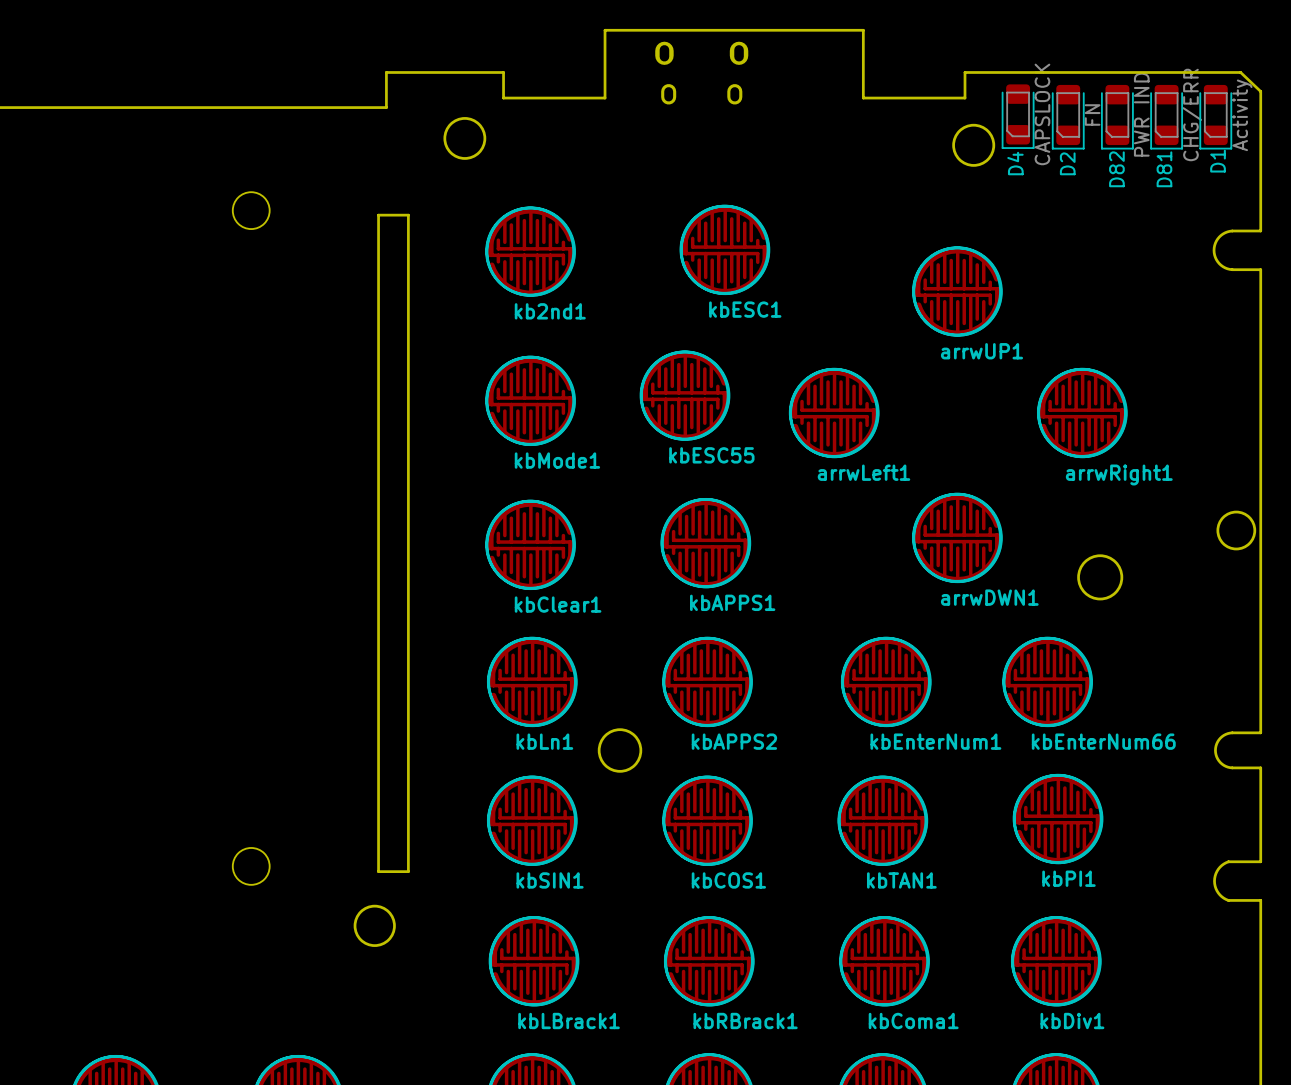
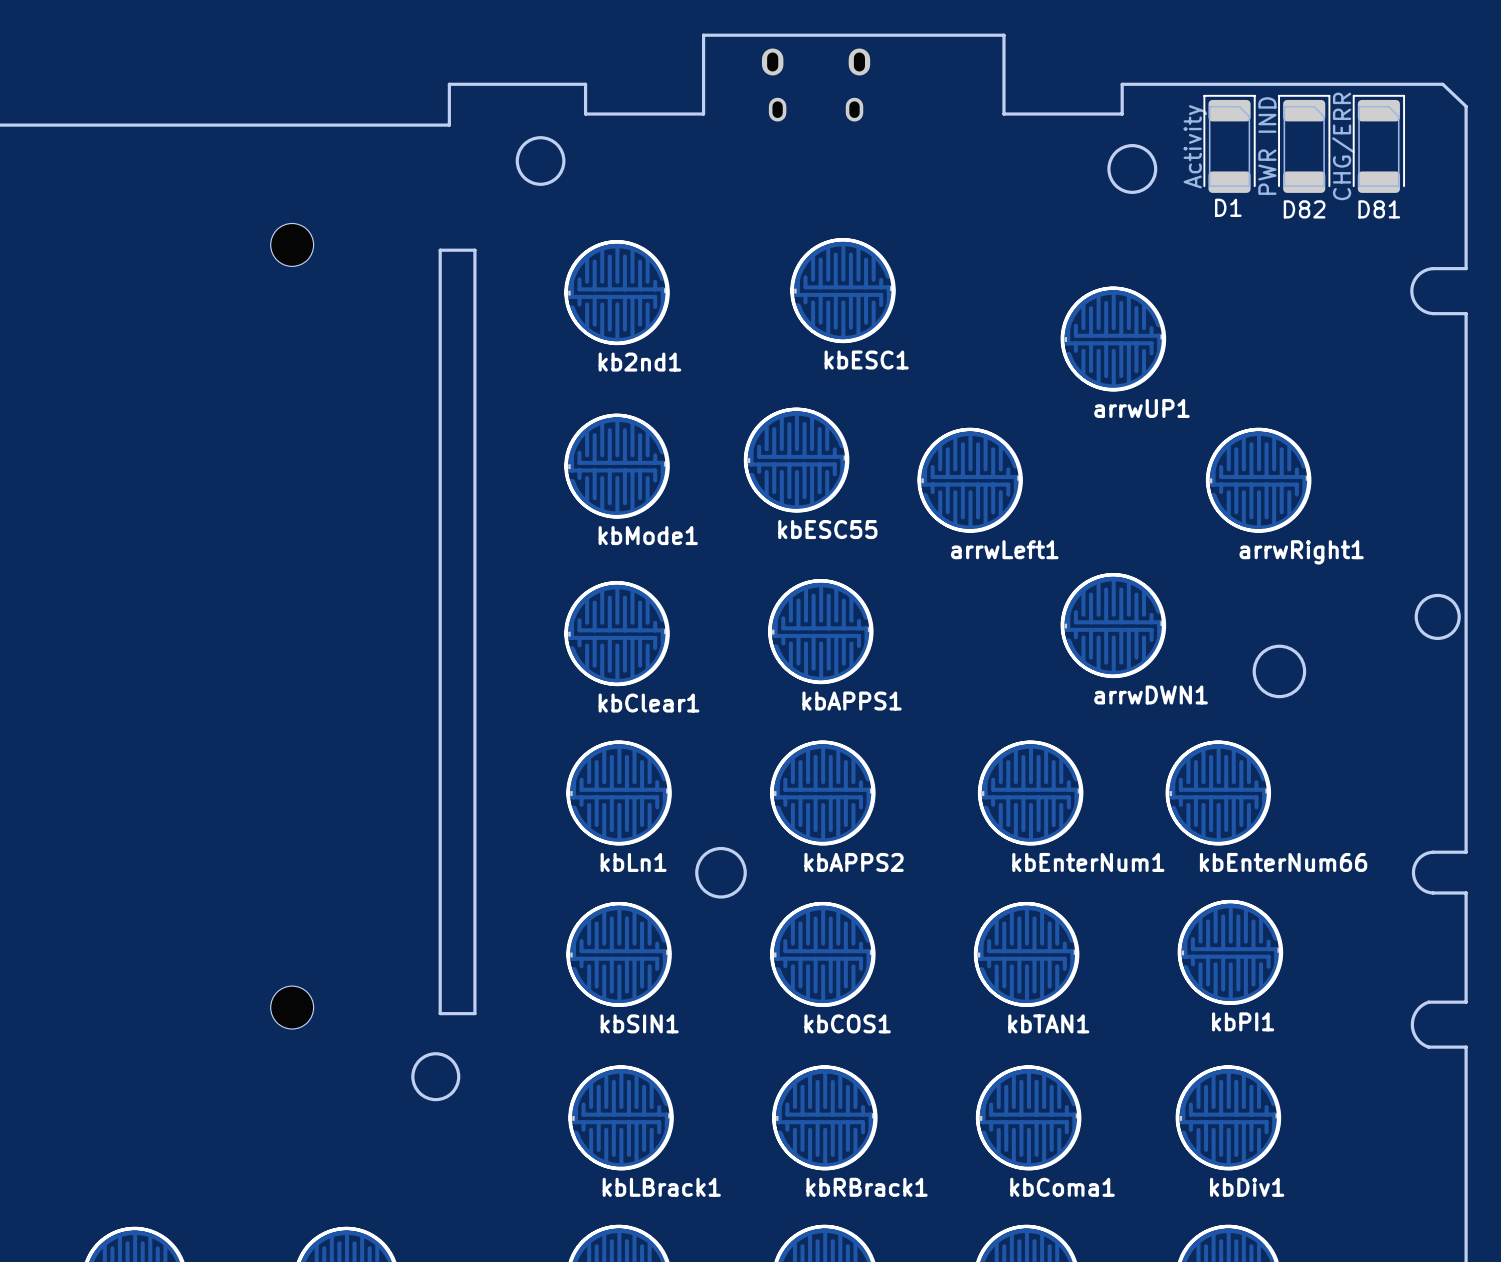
D82 footprint: [1101, 84, 1134, 150] -> [1278, 94, 1331, 193]
D81 footprint: [1150, 84, 1183, 150] -> [1352, 94, 1406, 193]
D1 footprint: [1199, 84, 1233, 150] -> [1203, 94, 1256, 193]
D82 value position: PWR IND (1141, 114) -> PWR IND (1267, 146)
D81 value position: CHG/ERR (1192, 114) -> CHG/ERR (1343, 146)
D1 value position: Activity (1242, 115) -> Activity (1195, 146)
D4: CAPSLOCK (1018, 116) -> none
D2: FN (1068, 117) -> none

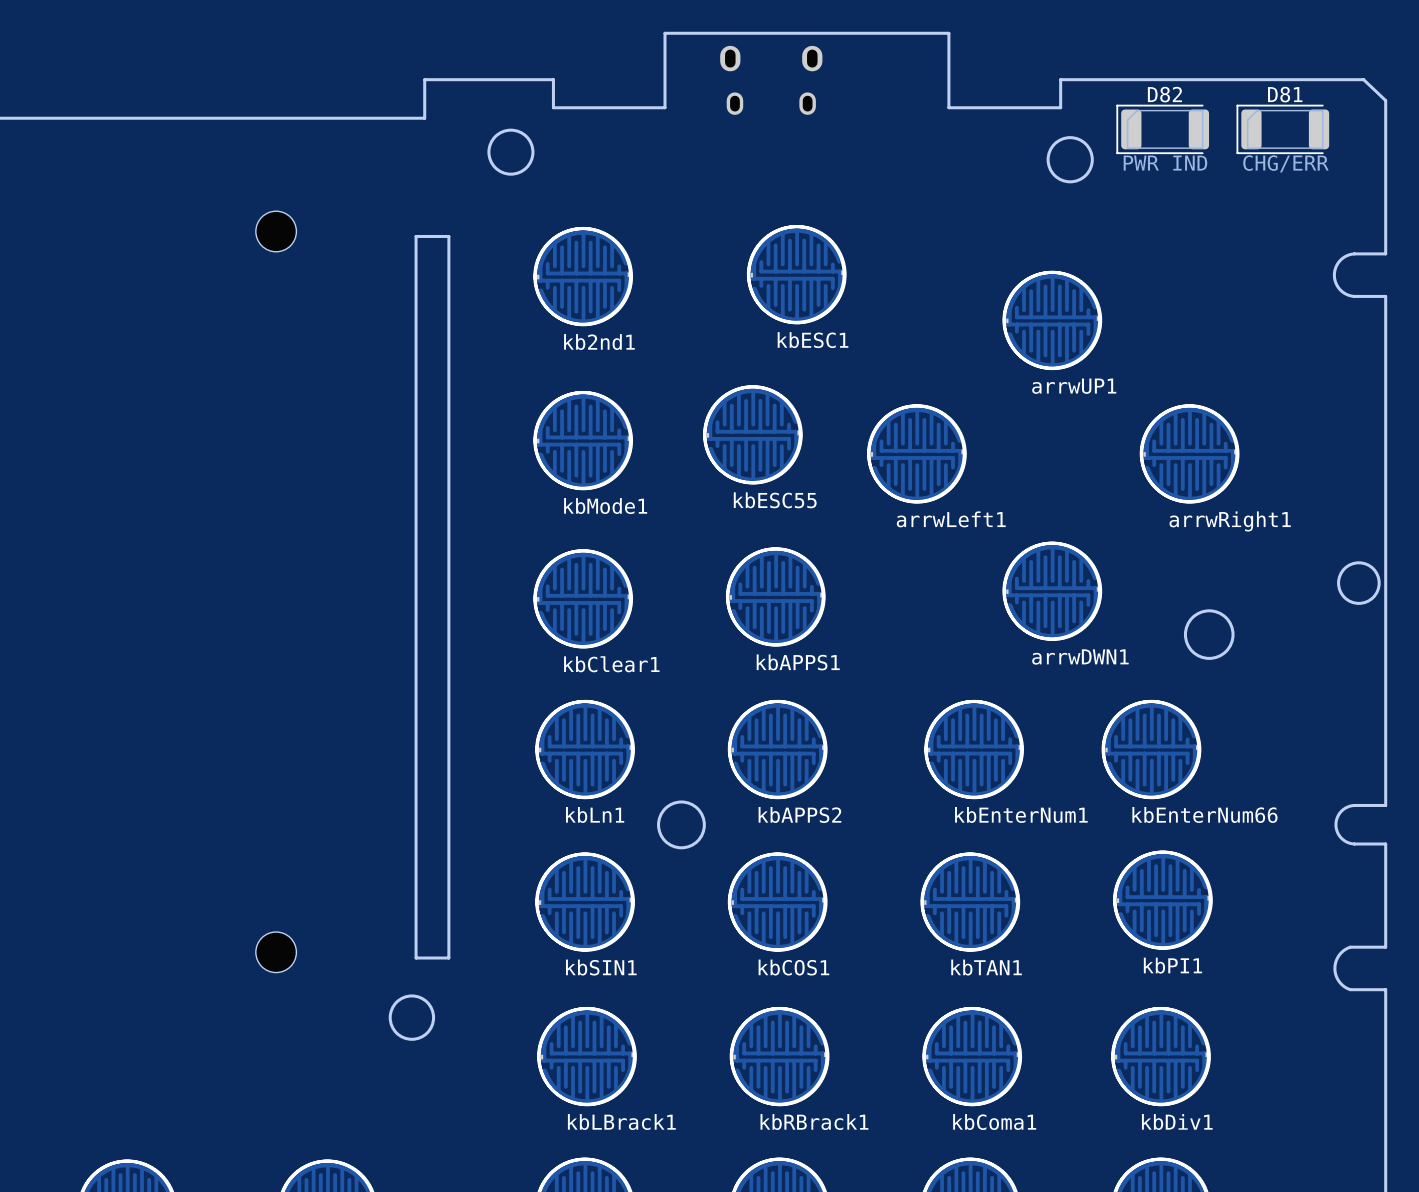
D1: Activity (1229, 143) -> none
D82 rotation: 0° (1304, 143) -> 90° counterclockwise (1162, 129)
D82 position: (1304, 143) -> (1162, 129)
D81 rotation: 0° (1378, 143) -> 90° counterclockwise (1282, 129)
D82 name position: D82 (1304, 209) -> D82 (1164, 94)
D81 name position: D81 (1379, 209) -> D81 (1285, 94)

